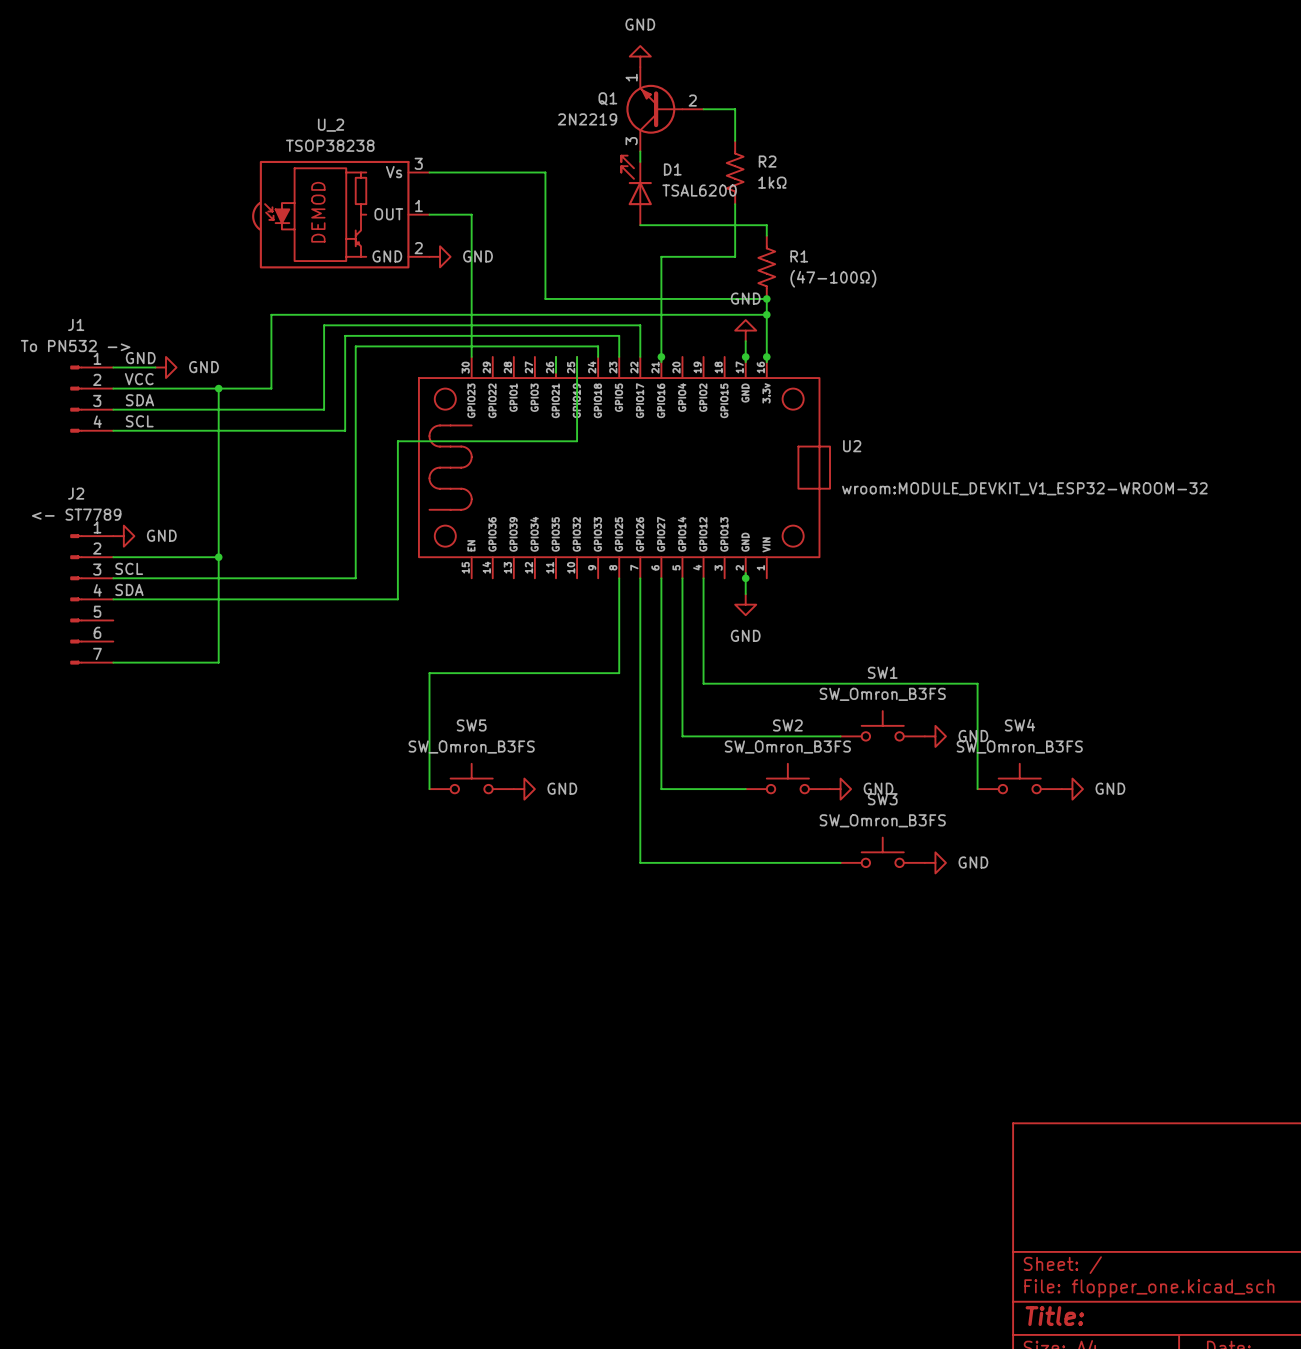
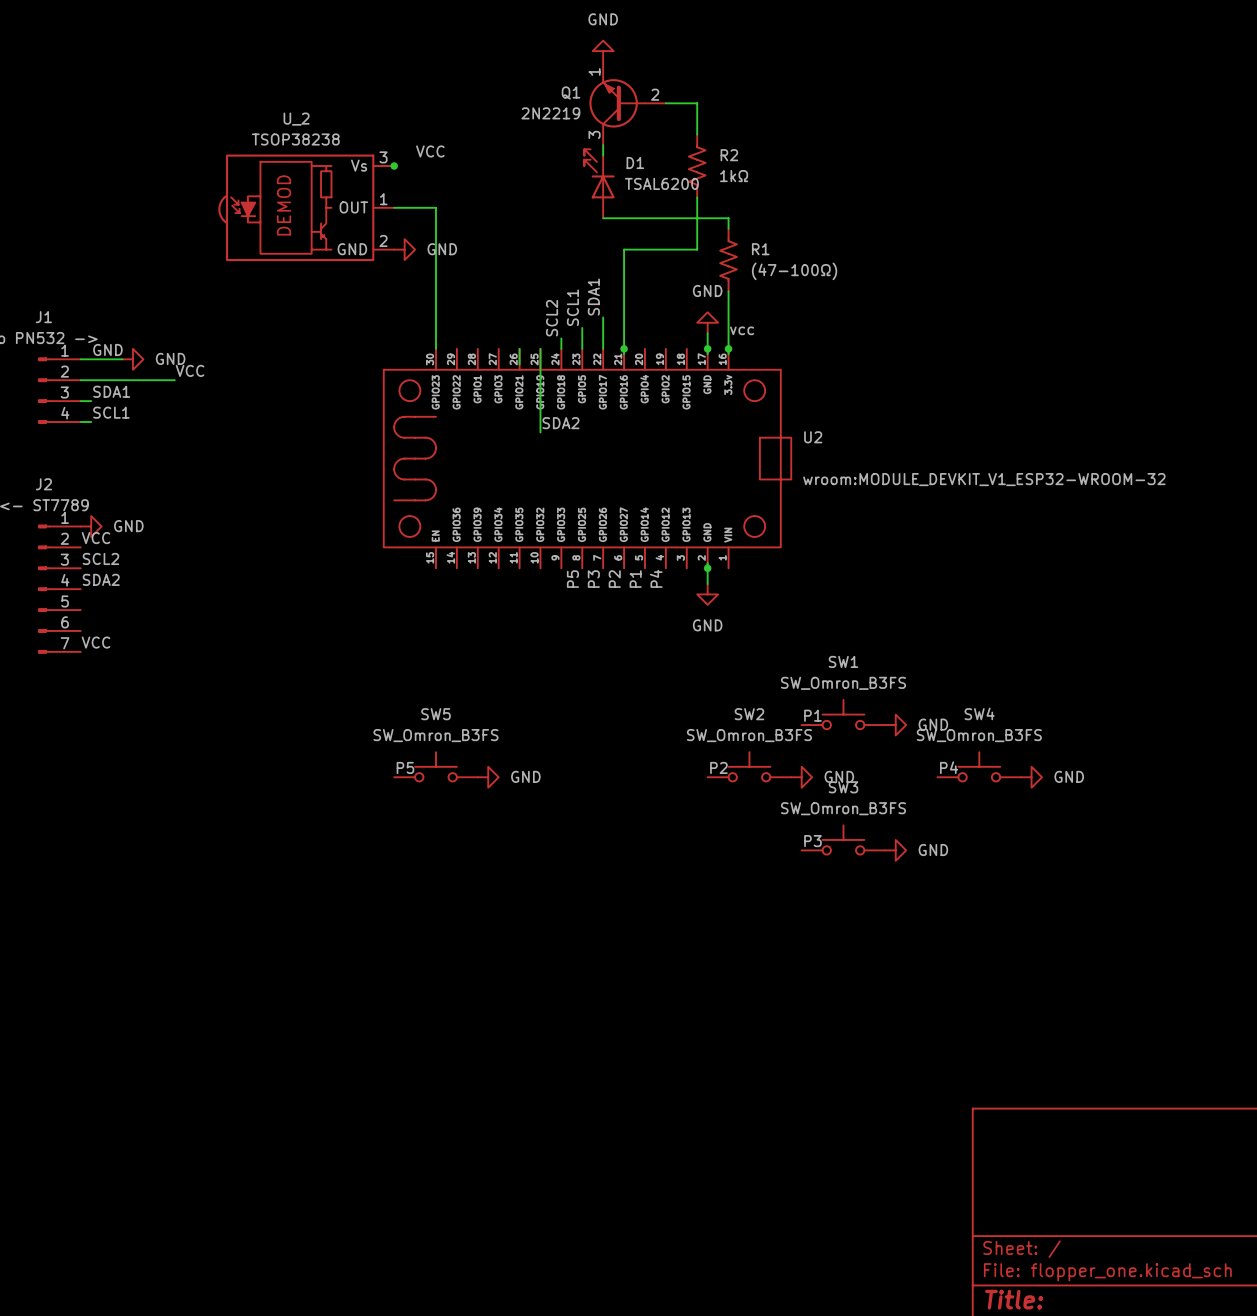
label: none -> VCC (430, 151)
wire: (429, 172) (545, 172) (545, 298) (766, 298) -> none
junction: none -> (394, 166)
junction: (766, 298) -> none
label: none -> SDA1 (593, 297)
wire: (766, 314) (271, 314) (271, 388) (208, 388) -> none
junction: (766, 314) -> none
label: none -> SCL1 (572, 307)
wire: (640, 325) (324, 325) (324, 409) (123, 409) -> none
label: none -> SCL2 (552, 318)
wire: (619, 335) (345, 335) (345, 430) (123, 430) -> none
label: none -> vcc (742, 330)
wire: (598, 346) (355, 346) (355, 578) (113, 578) -> none
label position: VCC (139, 379) -> VCC (190, 370)
wire: (218, 388) (218, 662) (113, 662) -> none
junction: (218, 388) -> none
label: SDA (139, 400) -> SDA1 (111, 391)
label: SCL (139, 421) -> SCL1 (111, 412)
label: none -> SDA2 (560, 423)
wire: (577, 441) (397, 441) (397, 599) (113, 599) -> none
label: none -> VCC (95, 538)
wire: (113, 557) (218, 557) -> none
junction: (218, 557) -> none
label: SCL (129, 568) -> SCL2 (100, 558)
wire: (619, 578) (619, 673) (429, 673) (429, 789) -> none
wire: (640, 578) (640, 862) (840, 862) -> none
wire: (661, 578) (661, 789) (745, 789) -> none
wire: (682, 578) (682, 736) (840, 736) -> none
wire: (703, 578) (703, 683) (977, 683) (977, 789) -> none
label: none -> P4 (656, 578)
label: SDA (129, 589) -> SDA2 (101, 579)
label: none -> P5 (572, 579)
label: none -> P3 (593, 579)
label: none -> P2 (614, 579)
label: none -> P1 (635, 579)
label: none -> VCC (95, 642)
label: none -> P1 (812, 715)
label: none -> P5 (405, 767)
label: none -> P2 (718, 767)
label: none -> P4 (949, 767)
label: none -> P3 (812, 841)

